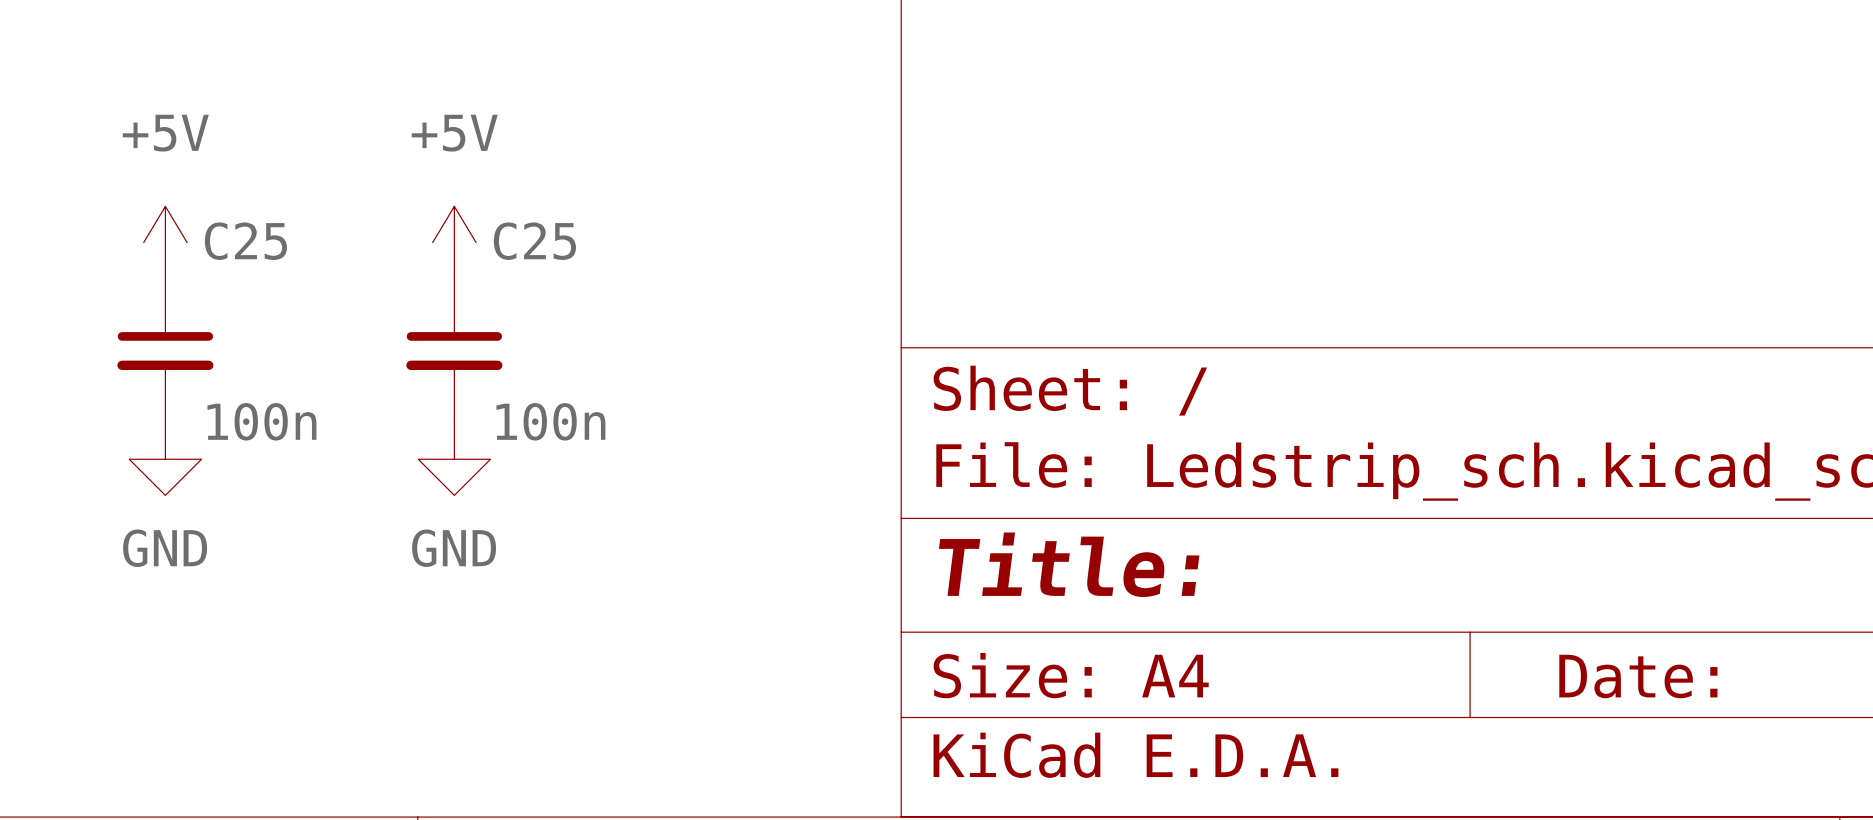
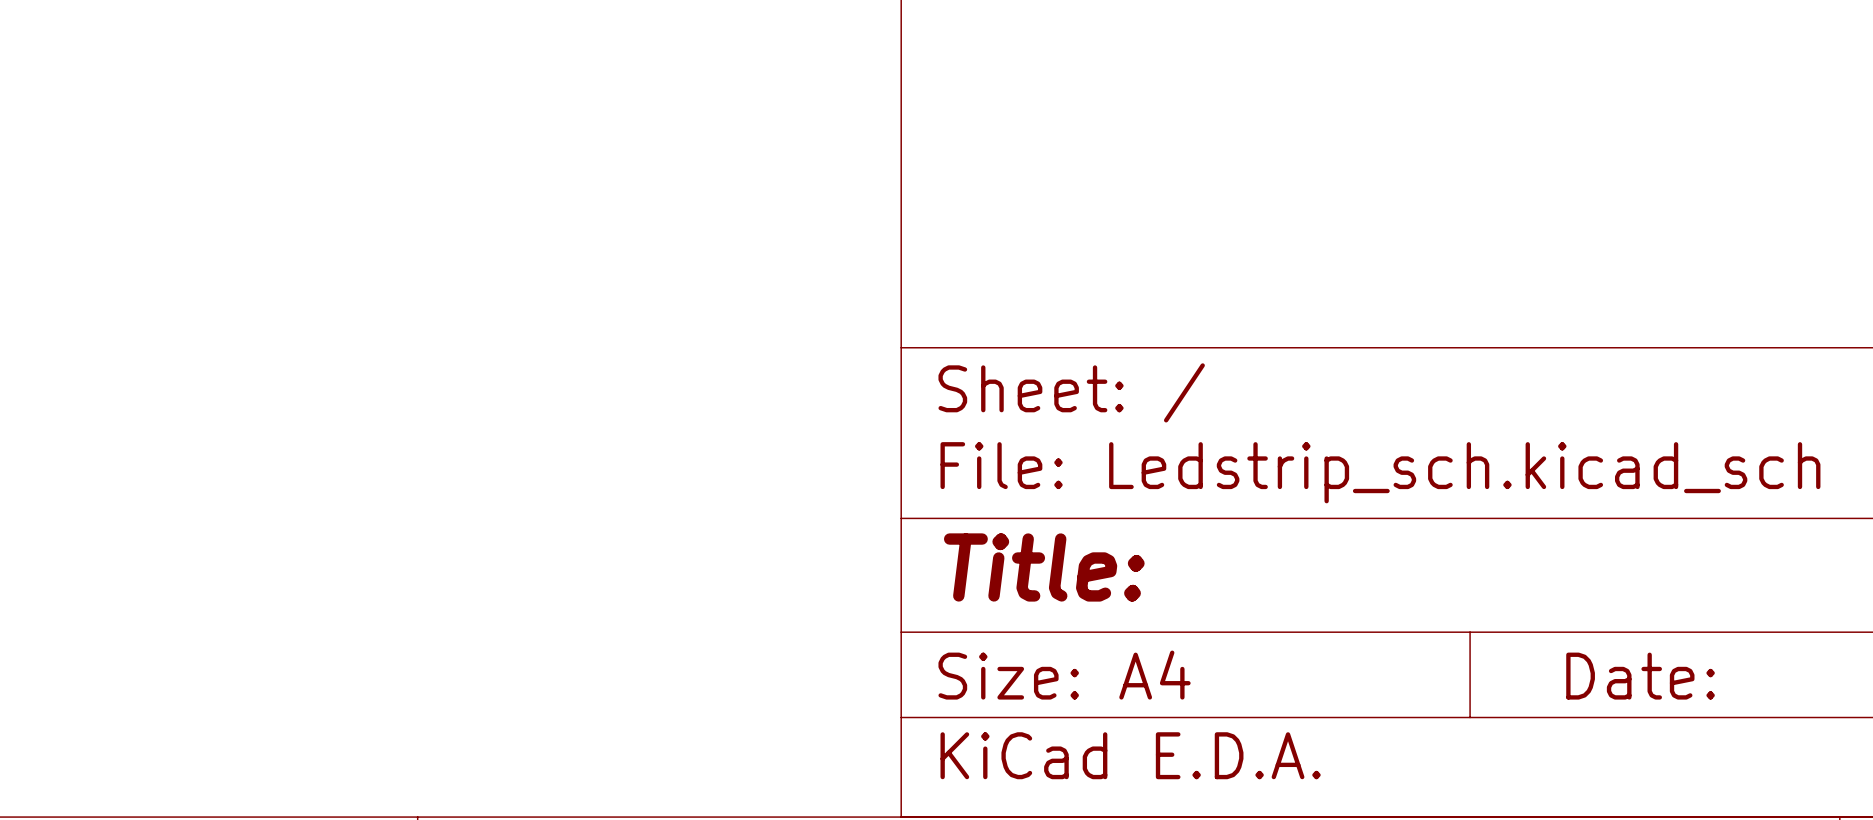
power symbol: +5V (165, 242) -> none
power symbol: +5V (454, 242) -> none
C25: 100n (165, 350) -> none
C25: 100n (454, 350) -> none
power symbol: GND (165, 459) -> none
power symbol: GND (454, 459) -> none

